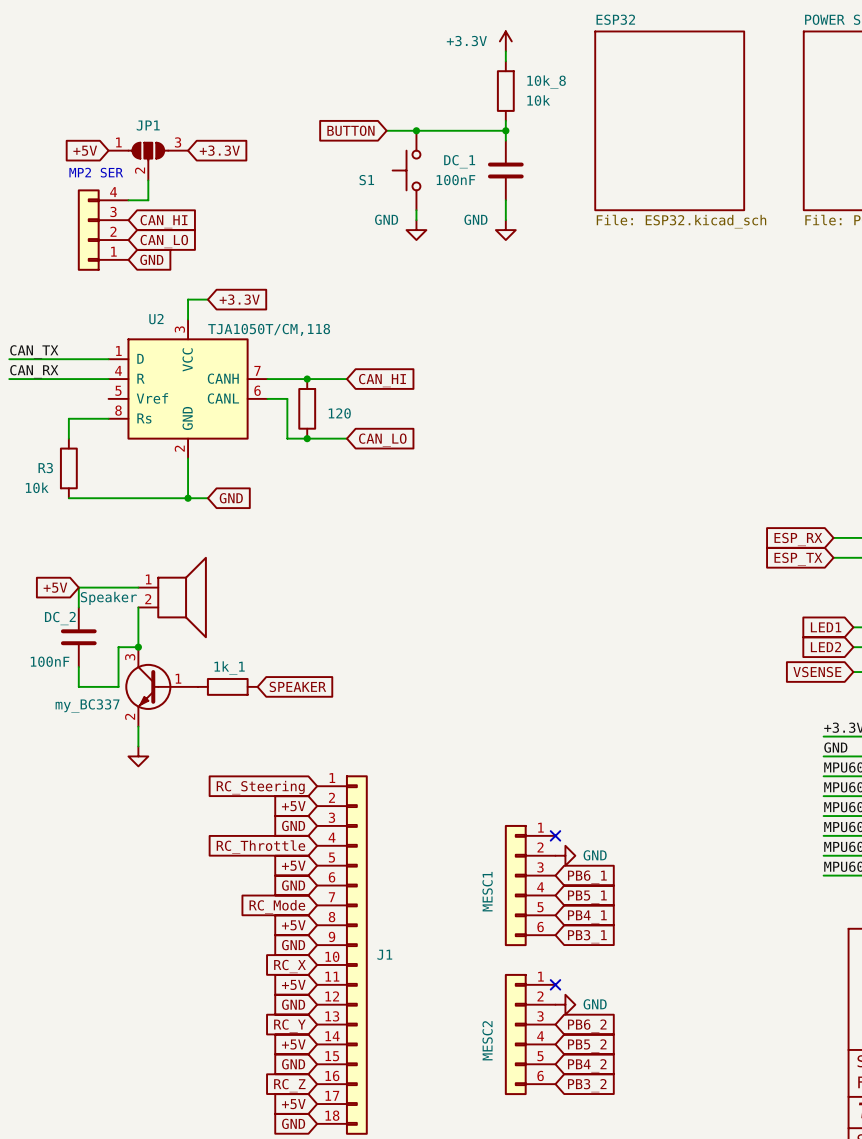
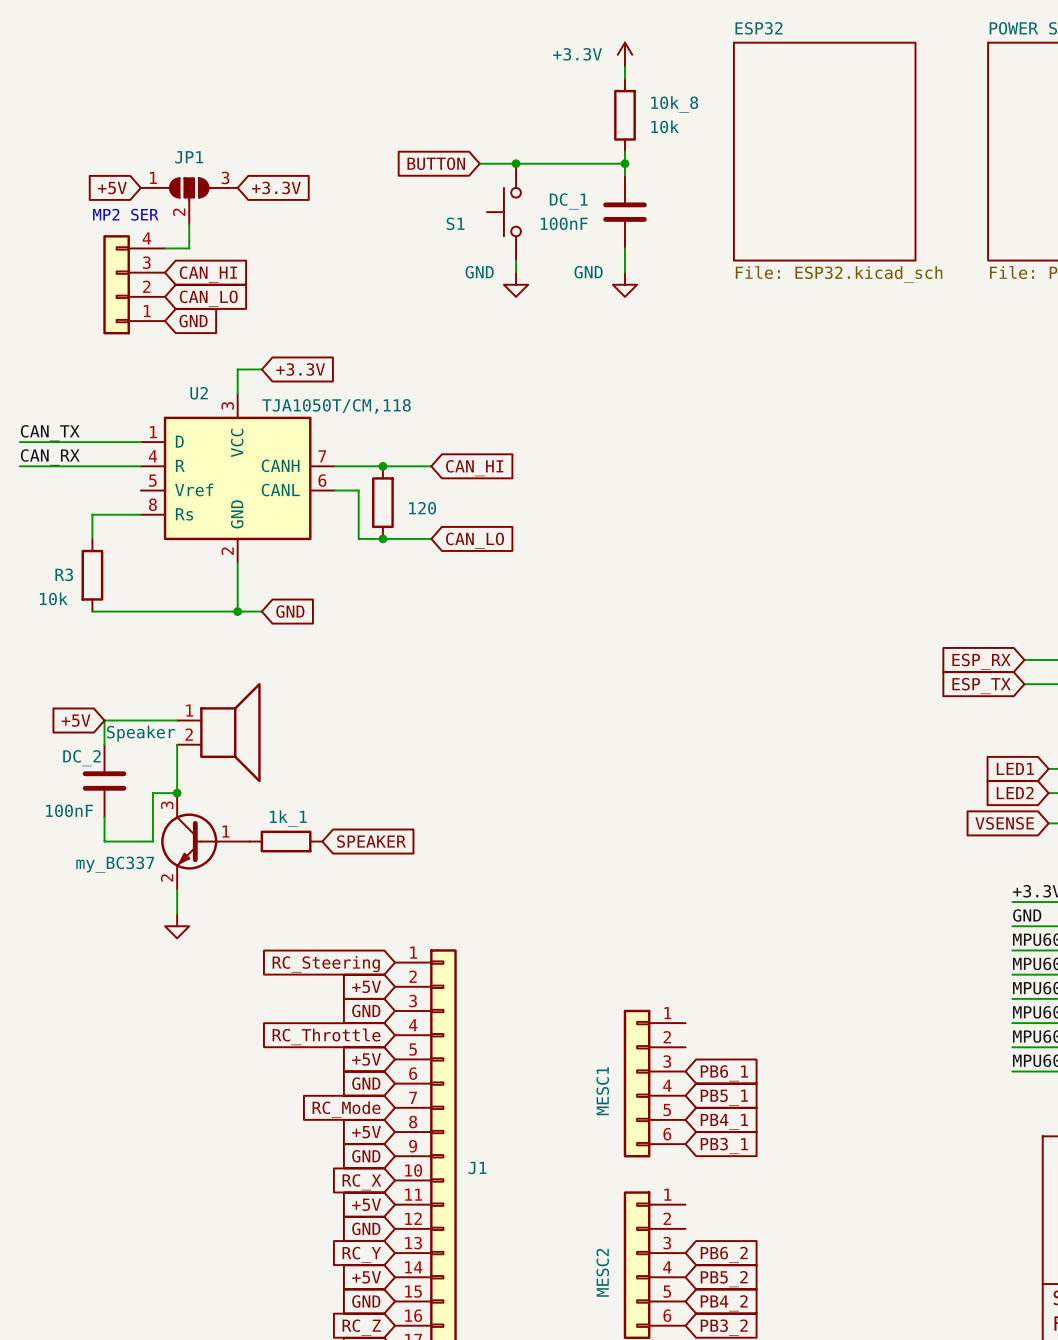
no-connect mark: (555, 835) -> none
power symbol: GND (565, 855) -> none
no-connect mark: (555, 984) -> none
power symbol: GND (565, 1004) -> none

